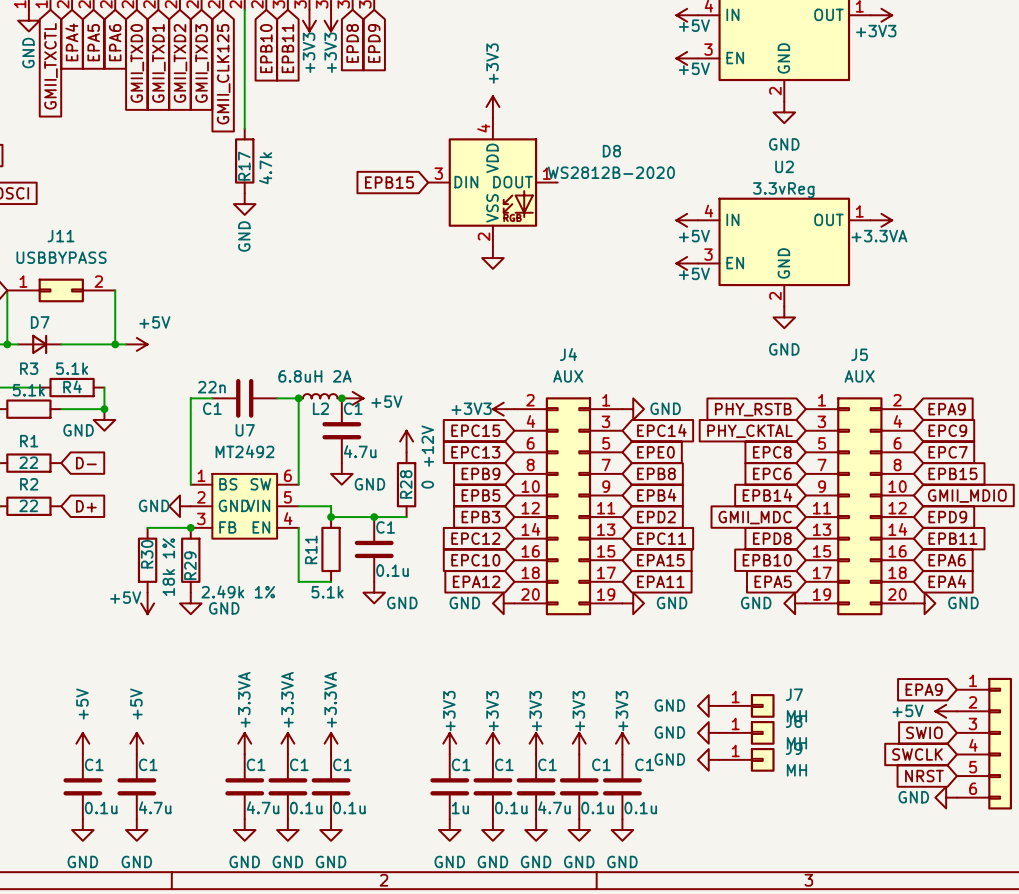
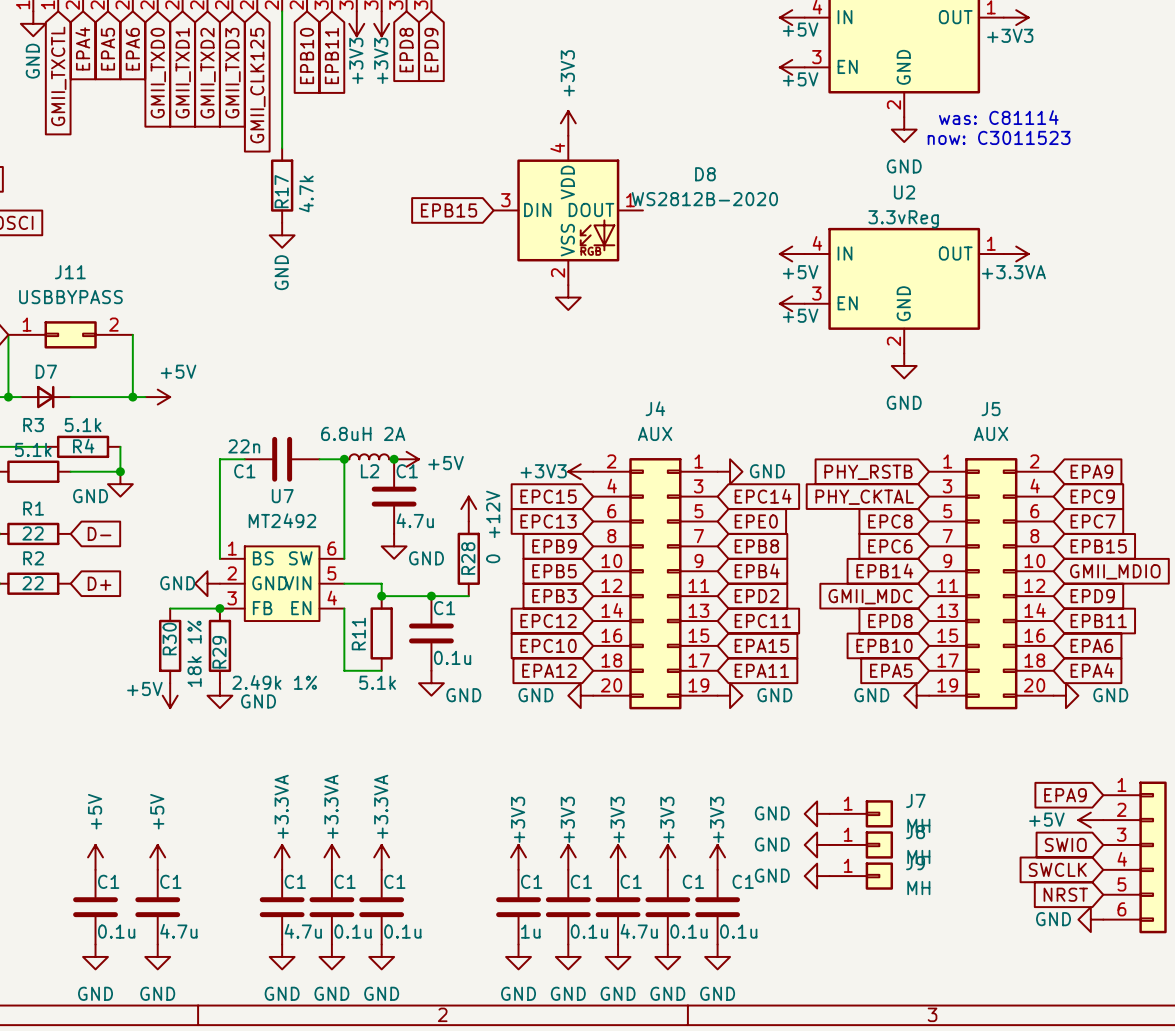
text: none -> was: C81114 (998, 117)
text: none -> now: C3011523 (999, 137)

